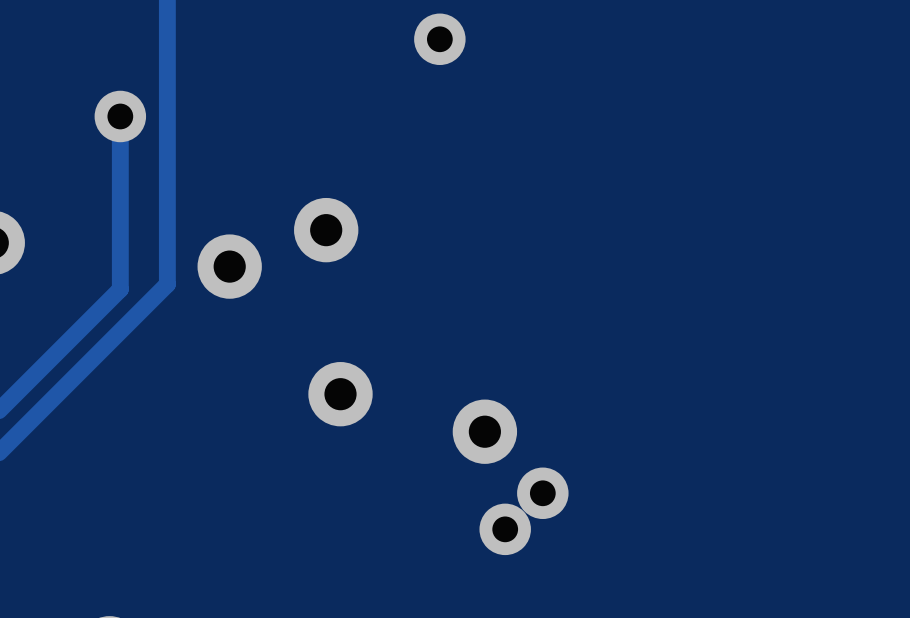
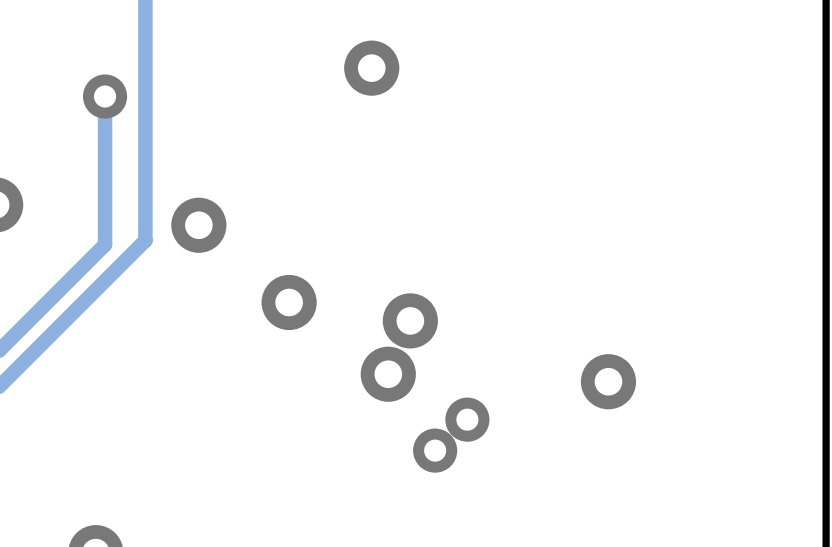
via position: (439, 39) -> (371, 68)
via: (326, 230) -> none
via: none -> (410, 320)
via position: (340, 394) -> (289, 302)
via: (484, 431) -> none
via: none -> (388, 374)
via: none -> (608, 381)

